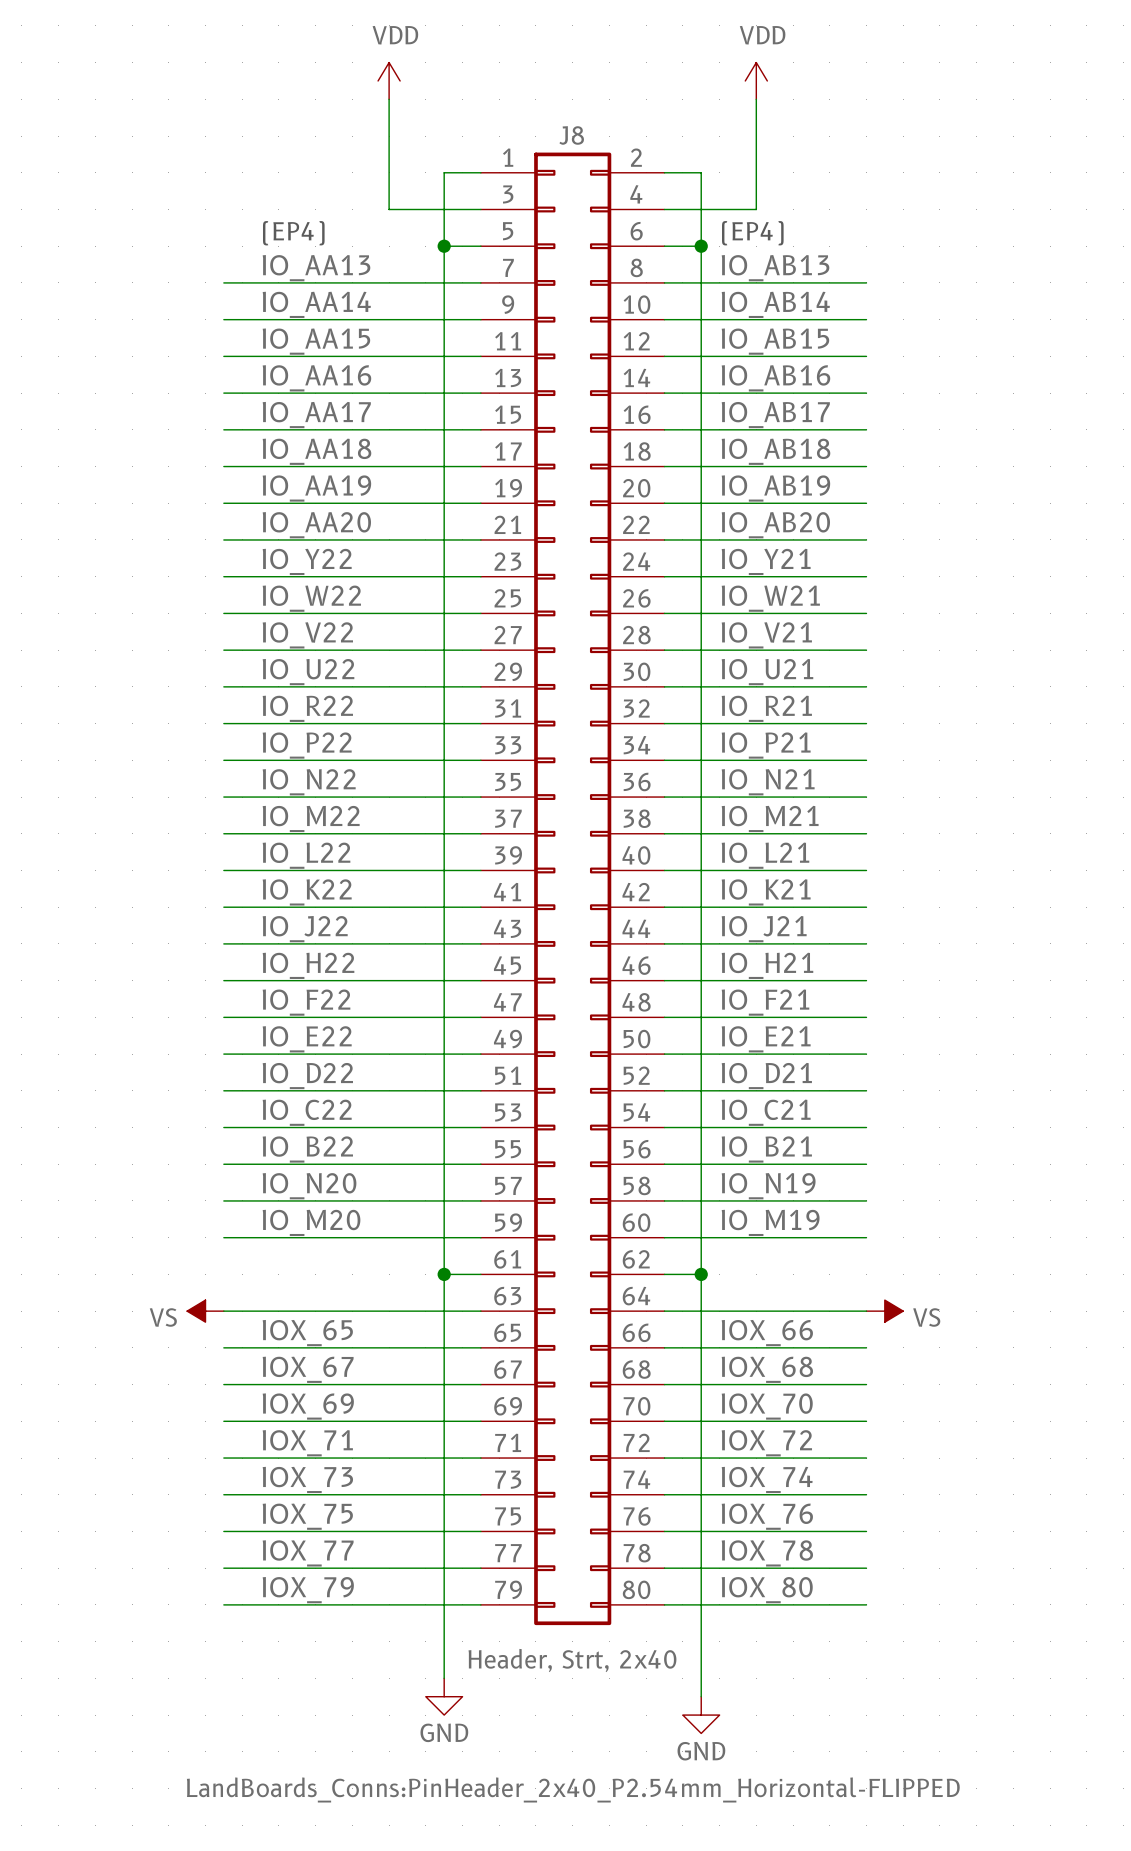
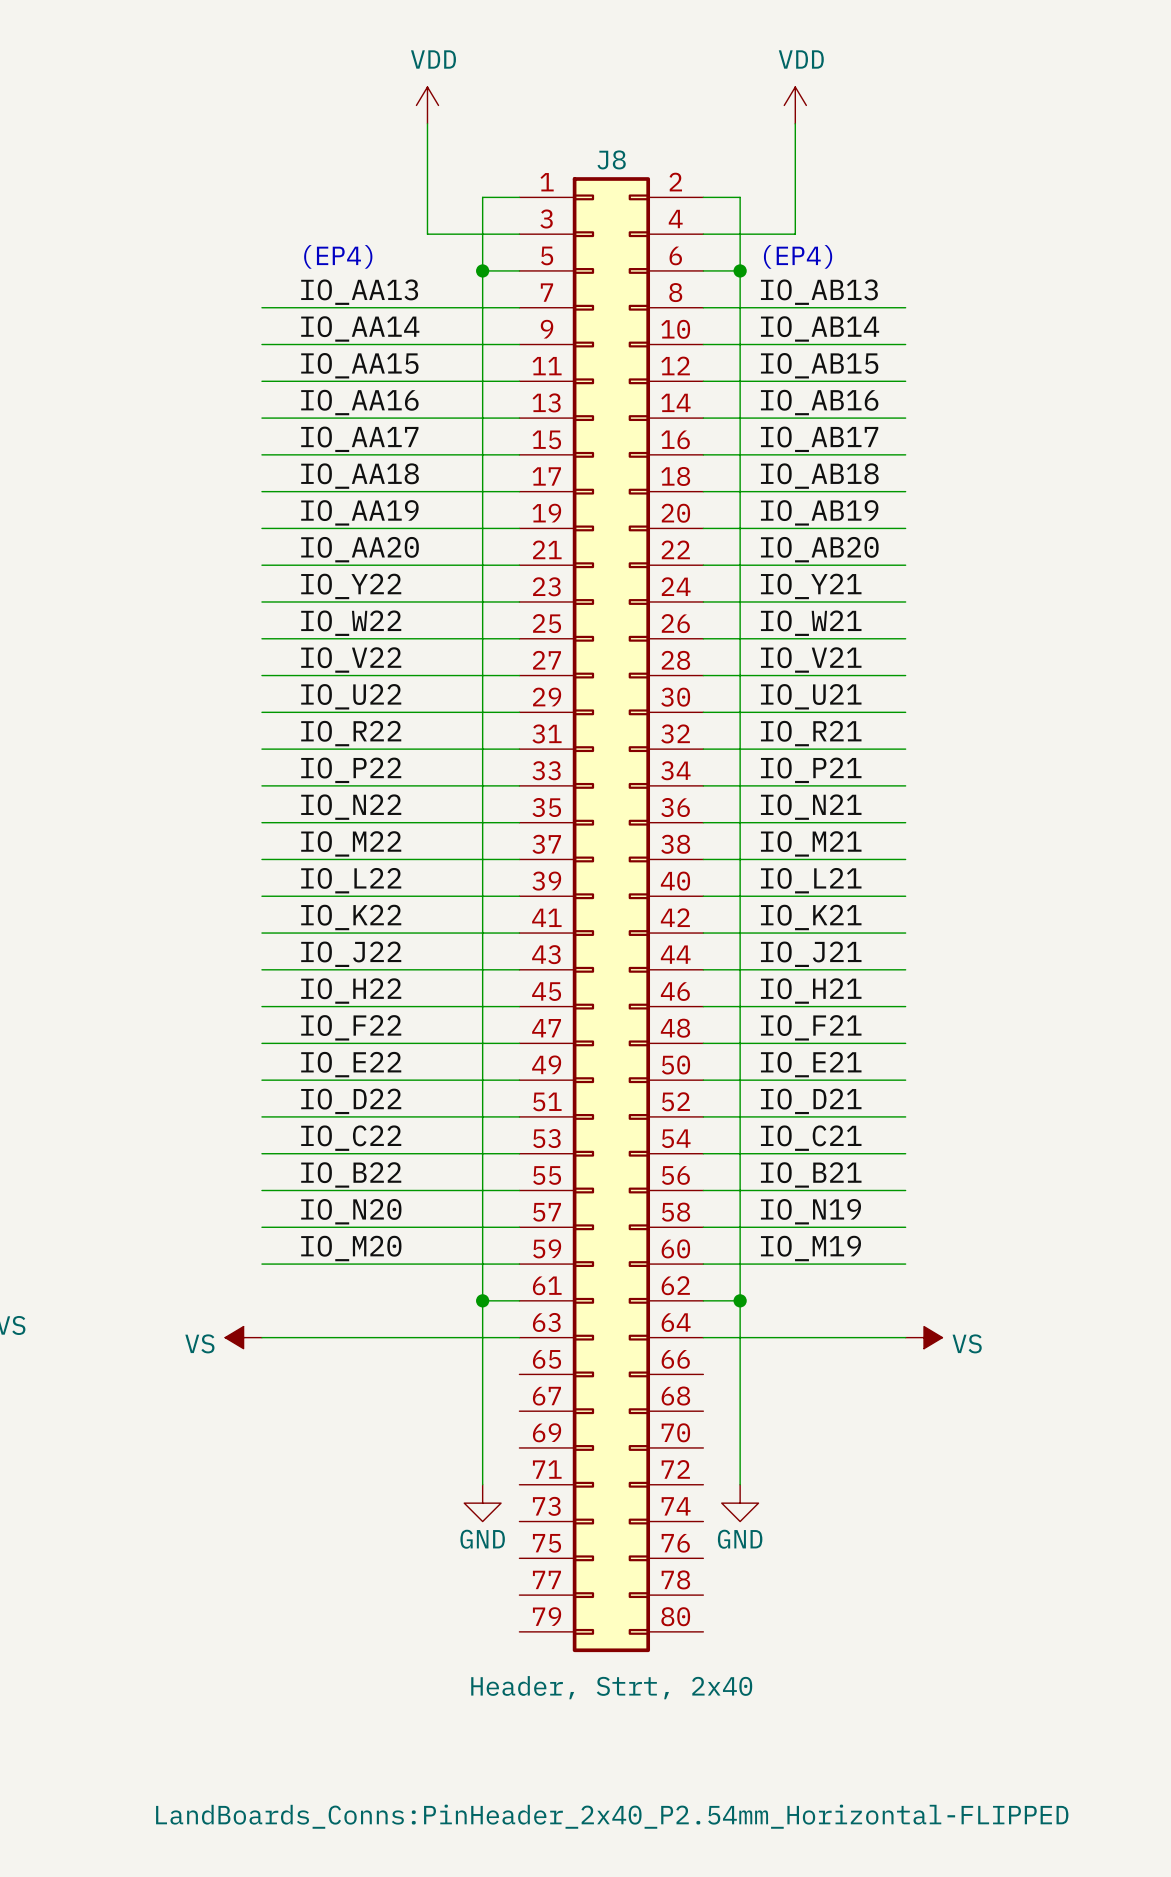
label: IOX_65 (307, 1333) -> none
label: IOX_66 (767, 1333) -> none
wire: (223, 1347) (480, 1347) -> none
wire: (664, 1347) (866, 1347) -> none
label: IOX_67 (308, 1369) -> none
label: IOX_68 (767, 1369) -> none
wire: (223, 1384) (480, 1384) -> none
wire: (664, 1384) (866, 1384) -> none
label: IOX_69 (308, 1406) -> none
label: IOX_70 (767, 1406) -> none
wire: (223, 1421) (480, 1421) -> none
wire: (664, 1421) (866, 1421) -> none
label: IOX_71 (307, 1443) -> none
label: IOX_72 (766, 1443) -> none
wire: (223, 1458) (480, 1458) -> none
wire: (444, 1458) (444, 1678) -> none
wire: (664, 1458) (866, 1458) -> none
wire: (701, 1458) (701, 1696) -> none
power symbol: none -> GND (482, 1503)
power symbol: none -> GND (740, 1503)
label: IOX_73 (307, 1479) -> none
label: IOX_74 (767, 1479) -> none
wire: (223, 1494) (480, 1494) -> none
wire: (664, 1494) (866, 1494) -> none
label: IOX_75 (307, 1516) -> none
label: IOX_76 (767, 1516) -> none
wire: (223, 1531) (480, 1531) -> none
wire: (664, 1531) (866, 1531) -> none
label: IOX_77 (308, 1553) -> none
label: IOX_78 (767, 1553) -> none
wire: (223, 1568) (480, 1568) -> none
wire: (664, 1568) (866, 1568) -> none
label: IOX_79 (308, 1590) -> none
label: IOX_80 (767, 1590) -> none
wire: (223, 1604) (480, 1604) -> none
wire: (664, 1604) (866, 1604) -> none
power symbol: GND (444, 1696) -> none
power symbol: GND (701, 1715) -> none

